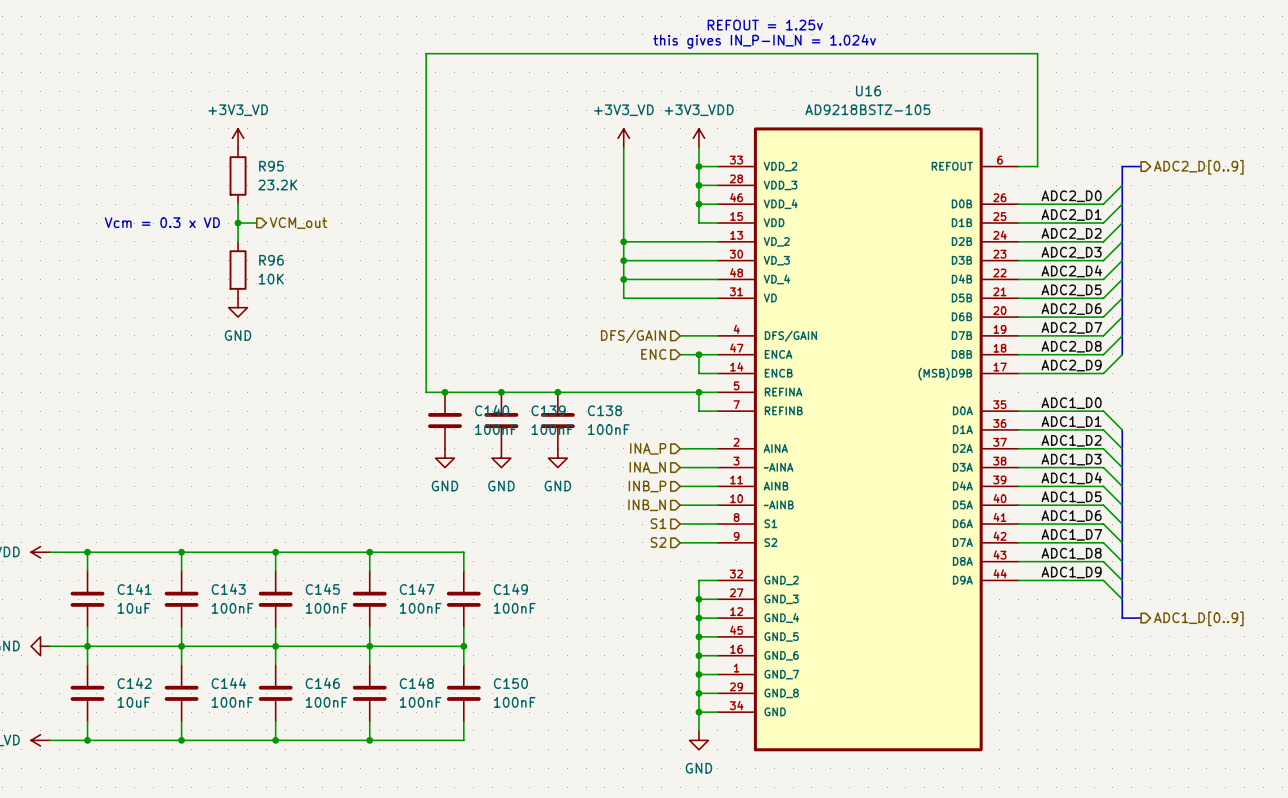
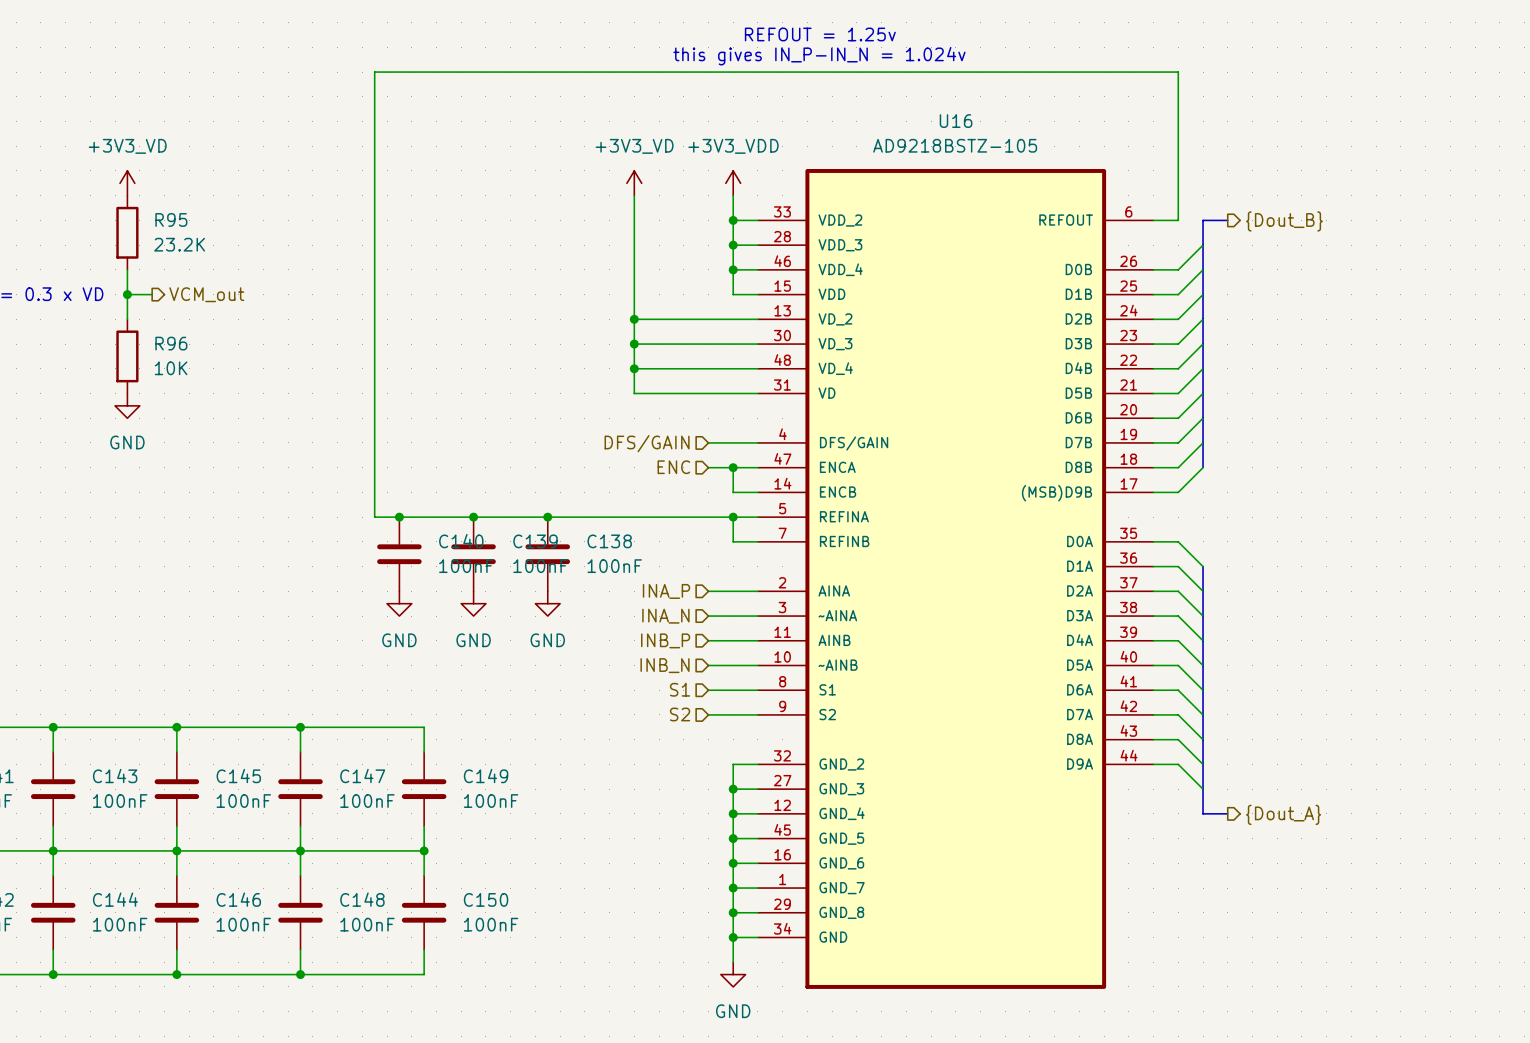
bus: (1141, 166) (1122, 166) (1122, 354) -> (1227, 220) (1203, 220) (1203, 467)
hierarchical label: none -> {Dout_B} (1284, 221)
hierarchical label: ADC2_D[0..9] (1198, 167) -> none
wire: (1122, 185) (1103, 204) (1037, 204) -> (1203, 245) (1178, 269)
label: ADC2_D0 (1071, 196) -> none
wire: (1122, 204) (1103, 223) (1037, 223) -> (1203, 269) (1178, 294)
label: ADC2_D1 (1071, 215) -> none
wire: (1122, 223) (1103, 241) (1037, 241) -> (1203, 294) (1178, 319)
label: ADC2_D2 (1071, 233) -> none
wire: (1122, 241) (1103, 260) (1037, 260) -> (1203, 319) (1178, 344)
label: ADC2_D3 (1071, 252) -> none
wire: (1122, 260) (1103, 279) (1037, 279) -> (1203, 344) (1178, 368)
label: ADC2_D4 (1071, 271) -> none
wire: (1122, 279) (1103, 298) (1037, 298) -> (1203, 368) (1178, 393)
label: ADC2_D5 (1071, 290) -> none
wire: (1122, 298) (1103, 317) (1037, 317) -> (1203, 393) (1178, 418)
label: ADC2_D6 (1071, 309) -> none
wire: (1122, 317) (1103, 335) (1037, 335) -> (1203, 418) (1178, 442)
label: ADC2_D7 (1071, 327) -> none
wire: (1122, 335) (1103, 354) (1037, 354) -> (1203, 442) (1178, 467)
label: ADC2_D8 (1071, 346) -> none
wire: (1122, 354) (1103, 373) (1037, 373) -> (1203, 467) (1178, 492)
label: ADC2_D9 (1071, 365) -> none
label: ADC1_D0 (1071, 403) -> none
wire: (1037, 411) (1103, 411) (1122, 429) -> (1178, 541) (1203, 566)
label: ADC1_D1 (1071, 422) -> none
wire: (1037, 429) (1103, 429) (1122, 448) -> (1178, 566) (1203, 591)
bus: (1122, 429) (1122, 618) (1141, 618) -> (1203, 566) (1203, 813) (1227, 813)
label: ADC1_D2 (1071, 440) -> none
wire: (1037, 448) (1103, 448) (1122, 467) -> (1178, 591) (1203, 616)
label: ADC1_D3 (1071, 459) -> none
wire: (1037, 467) (1103, 467) (1122, 486) -> (1178, 616) (1203, 640)
label: ADC1_D4 (1071, 478) -> none
wire: (1037, 486) (1103, 486) (1122, 505) -> (1178, 640) (1203, 665)
label: ADC1_D5 (1071, 497) -> none
wire: (1037, 505) (1103, 505) (1122, 524) -> (1178, 665) (1203, 690)
label: ADC1_D6 (1071, 516) -> none
wire: (1037, 524) (1103, 524) (1122, 542) -> (1178, 690) (1203, 714)
label: ADC1_D7 (1071, 534) -> none
wire: (1037, 542) (1103, 542) (1122, 561) -> (1178, 714) (1203, 739)
label: ADC1_D8 (1071, 553) -> none
wire: (1037, 561) (1103, 561) (1122, 580) -> (1178, 739) (1203, 764)
label: ADC1_D9 (1071, 572) -> none
wire: (1037, 580) (1103, 580) (1122, 599) -> (1178, 764) (1203, 789)
hierarchical label: none -> {Dout_A} (1283, 814)
hierarchical label: ADC1_D[0..9] (1198, 618) -> none

